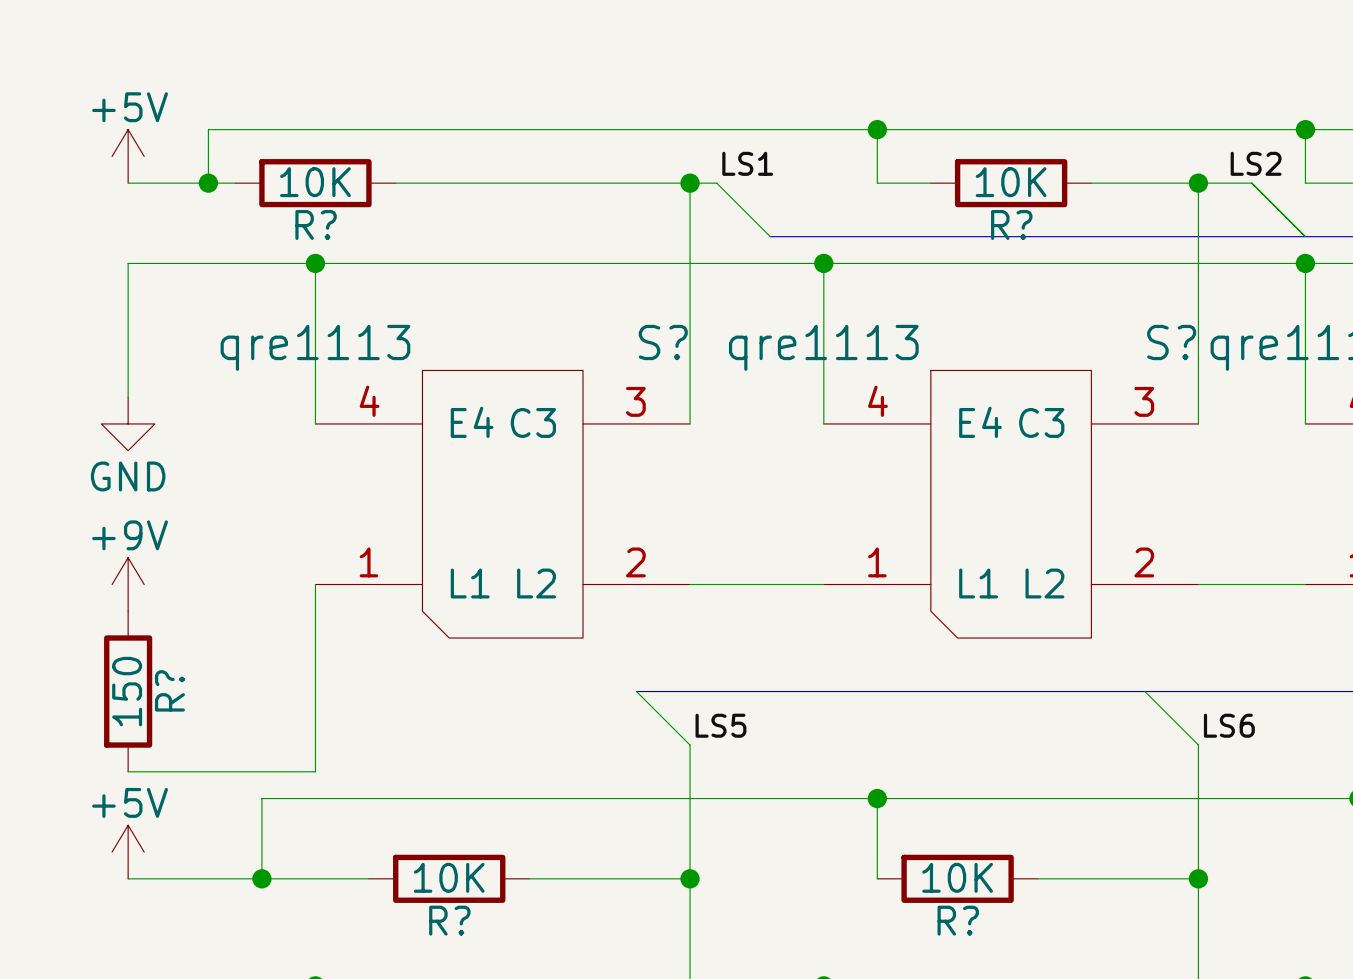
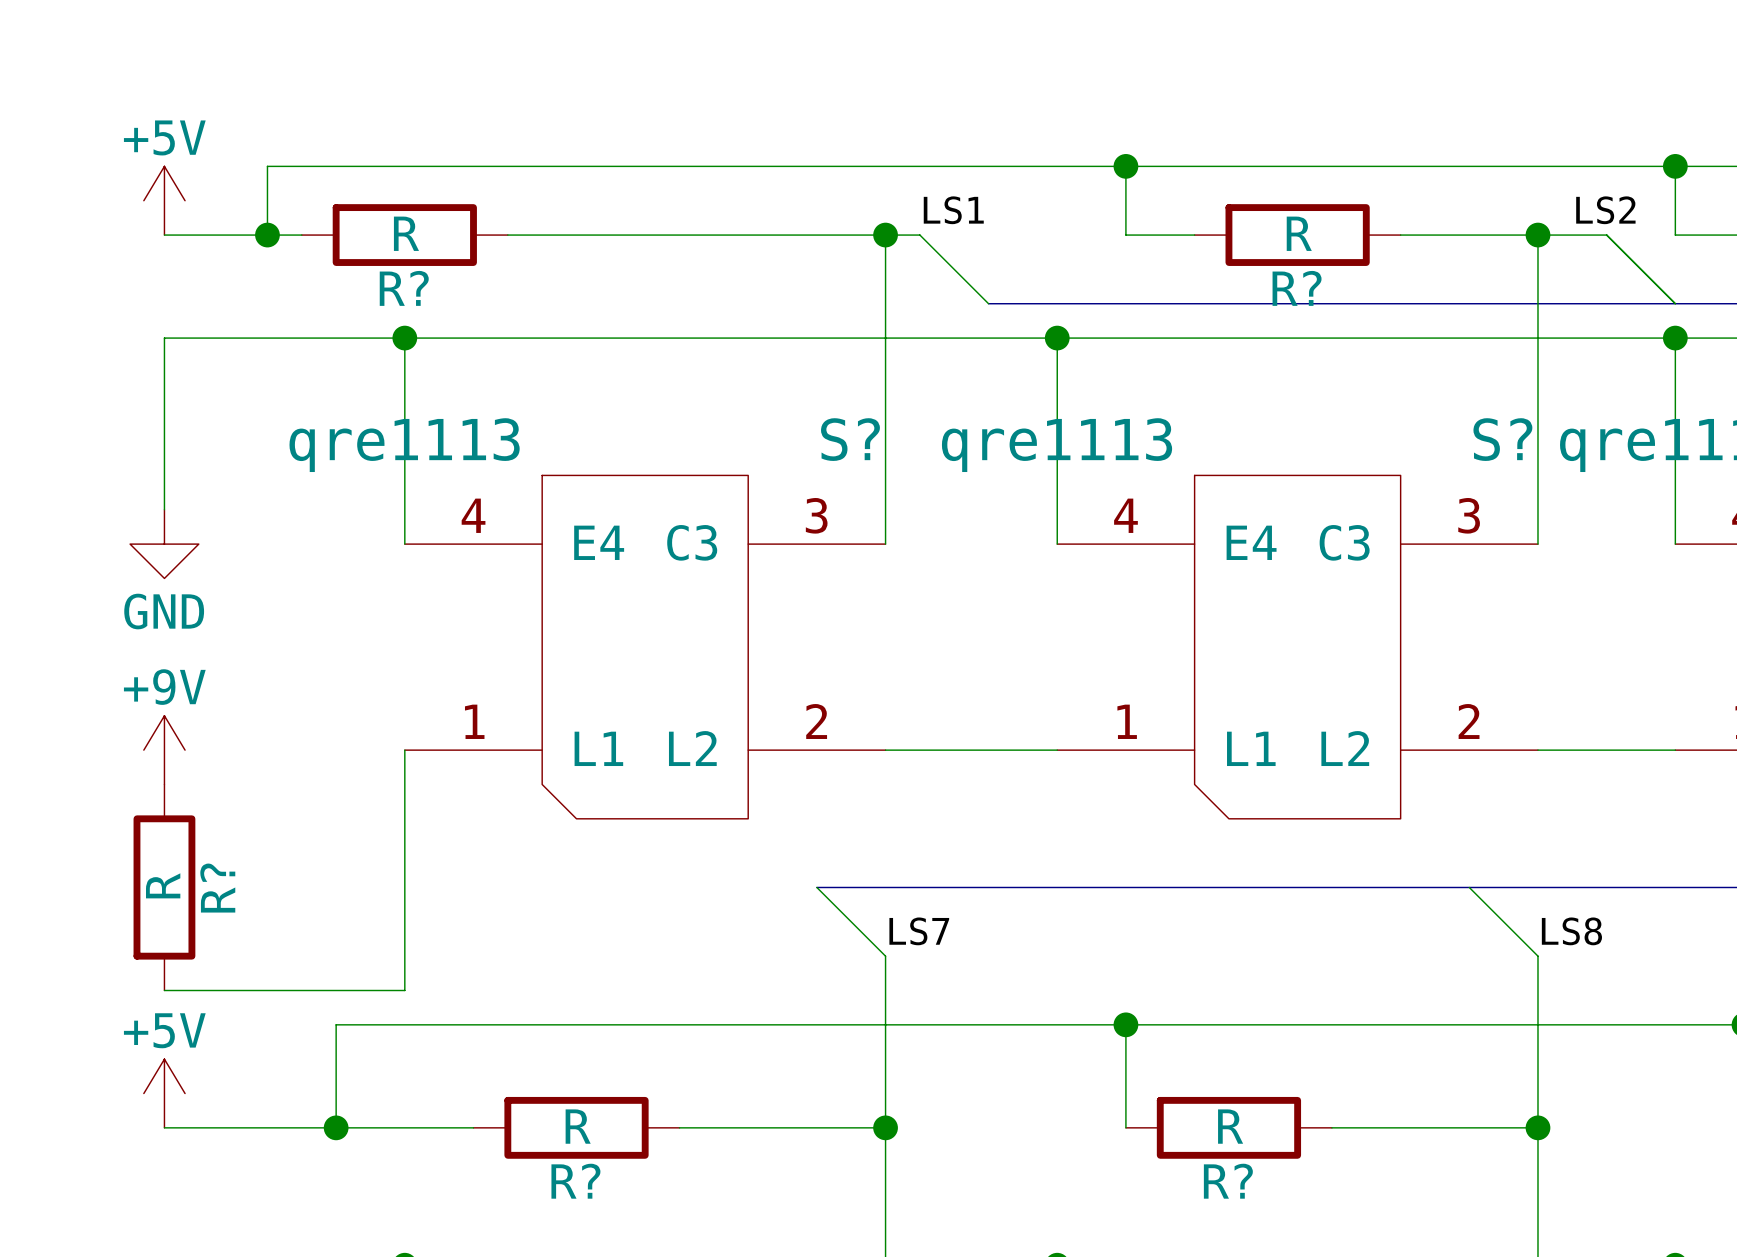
R? value: 10K (315, 182) -> R (406, 233)
R? value: 10K (1011, 182) -> R (1299, 233)
R? value: 150 (127, 691) -> R (163, 885)
label: LS5 (720, 725) -> LS7 (919, 931)
label: LS6 (1229, 725) -> LS8 (1571, 931)
R? value: 10K (449, 877) -> R (578, 1126)
R? value: 10K (957, 877) -> R (1230, 1126)

